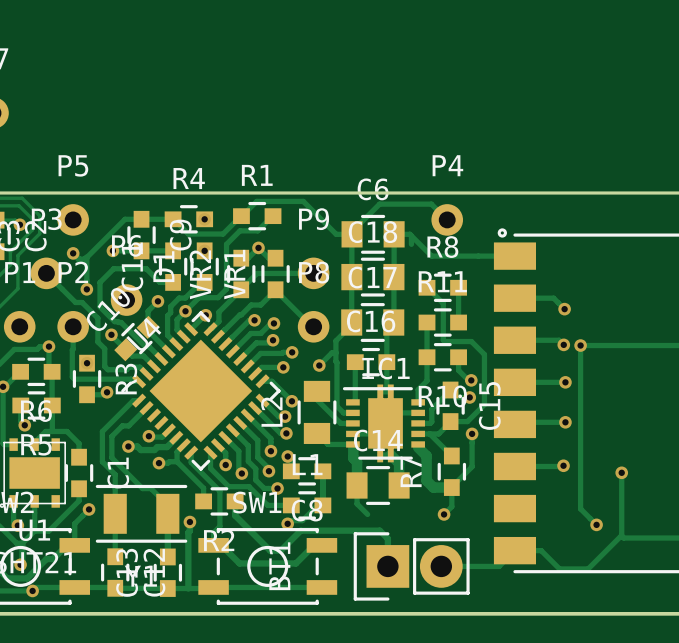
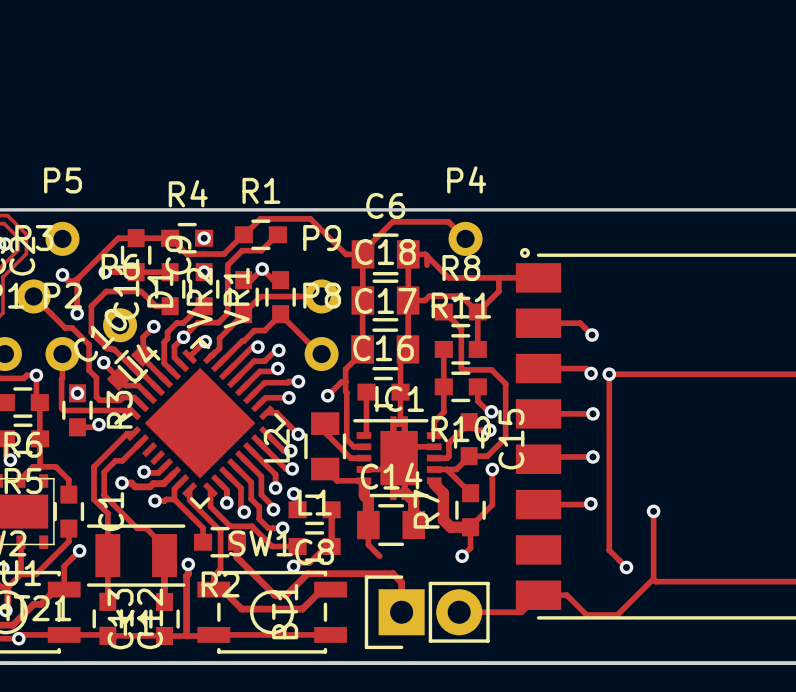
track: none -> (498, 278) (498, 291) (478, 311)
track: none -> (408, 300) (425, 300) (429, 296) (461, 296) (477, 311)

